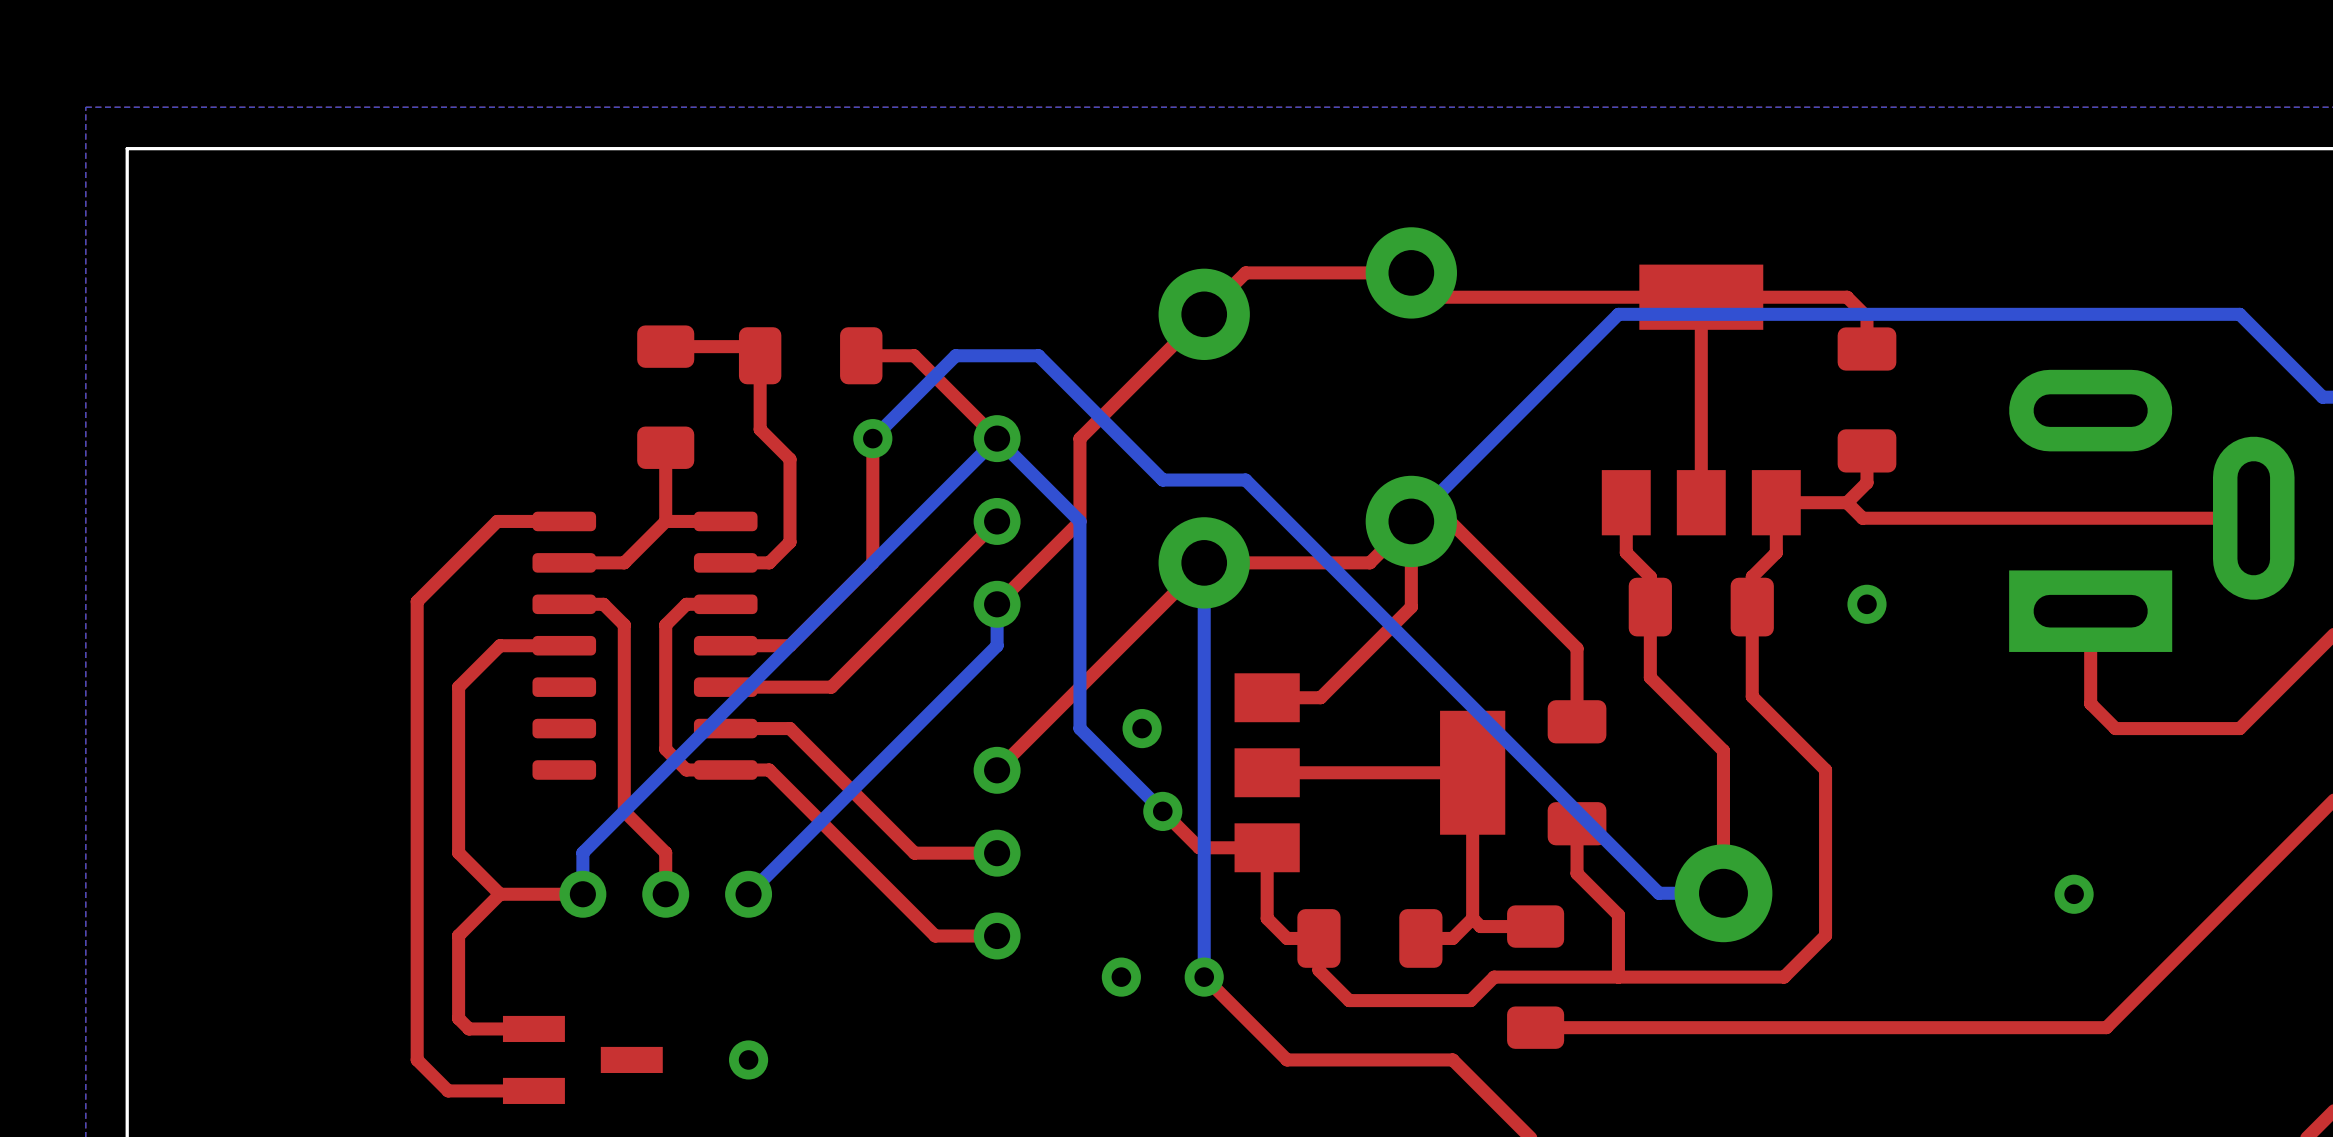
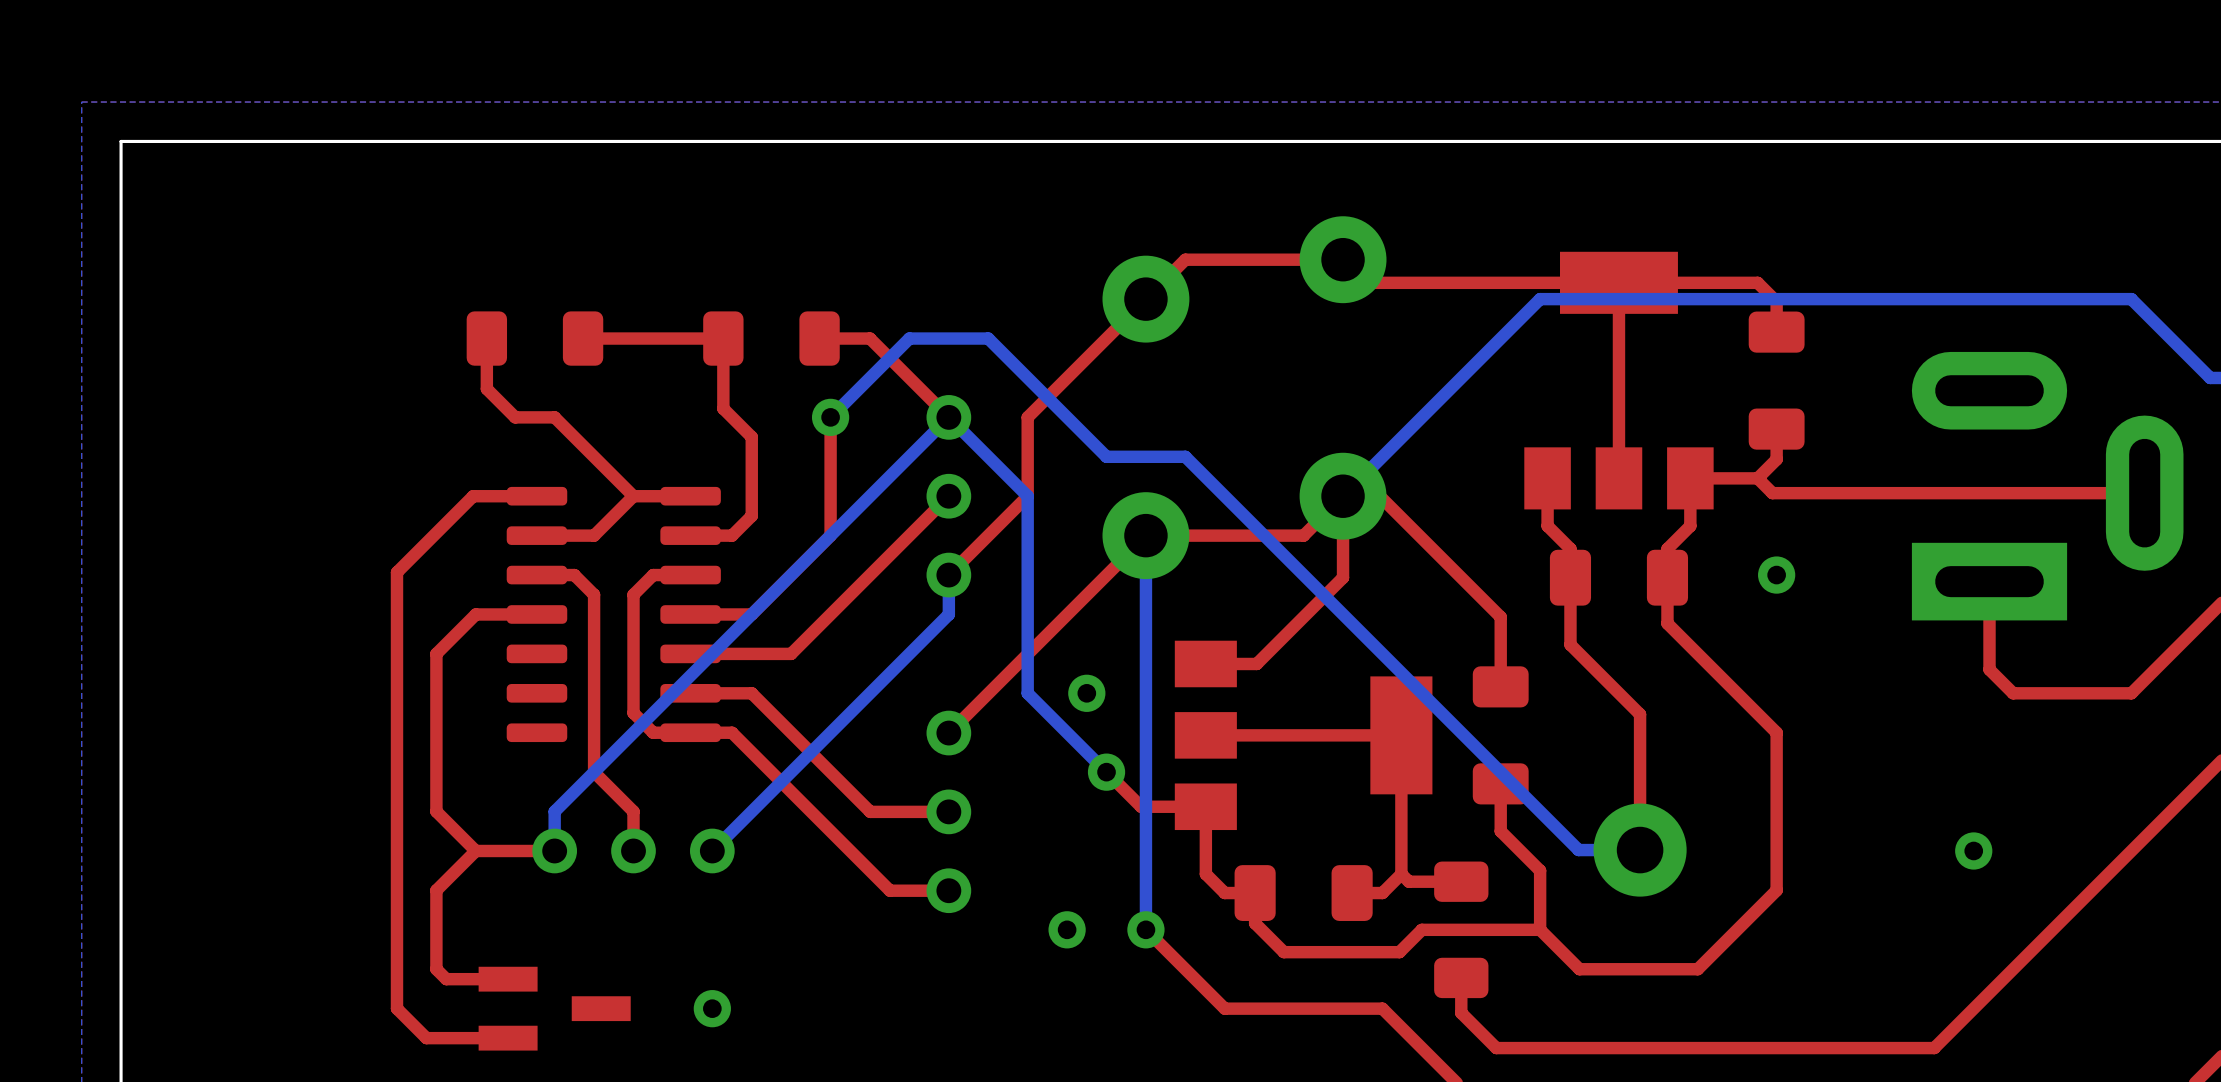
top track: (665, 346) (751, 346) (760, 355) -> (583, 338) (723, 338)
part rotation: 0° (665, 397) -> 90° clockwise (534, 338)
part position: (665, 397) -> (534, 338)
top track: (665, 447) (665, 521) -> (486, 338) (486, 388) (515, 417) (554, 417) (633, 496)
top track: (1752, 655) (1752, 696) (1825, 769) (1825, 935) (1784, 977) (1618, 977) -> (1667, 623) (1776, 732) (1776, 890) (1697, 969) (1579, 969) (1540, 929)
top track: (2106, 1027) (1535, 1027) -> (2004, 977) (1934, 1048) (1496, 1048) (1461, 1013) (1461, 977)

